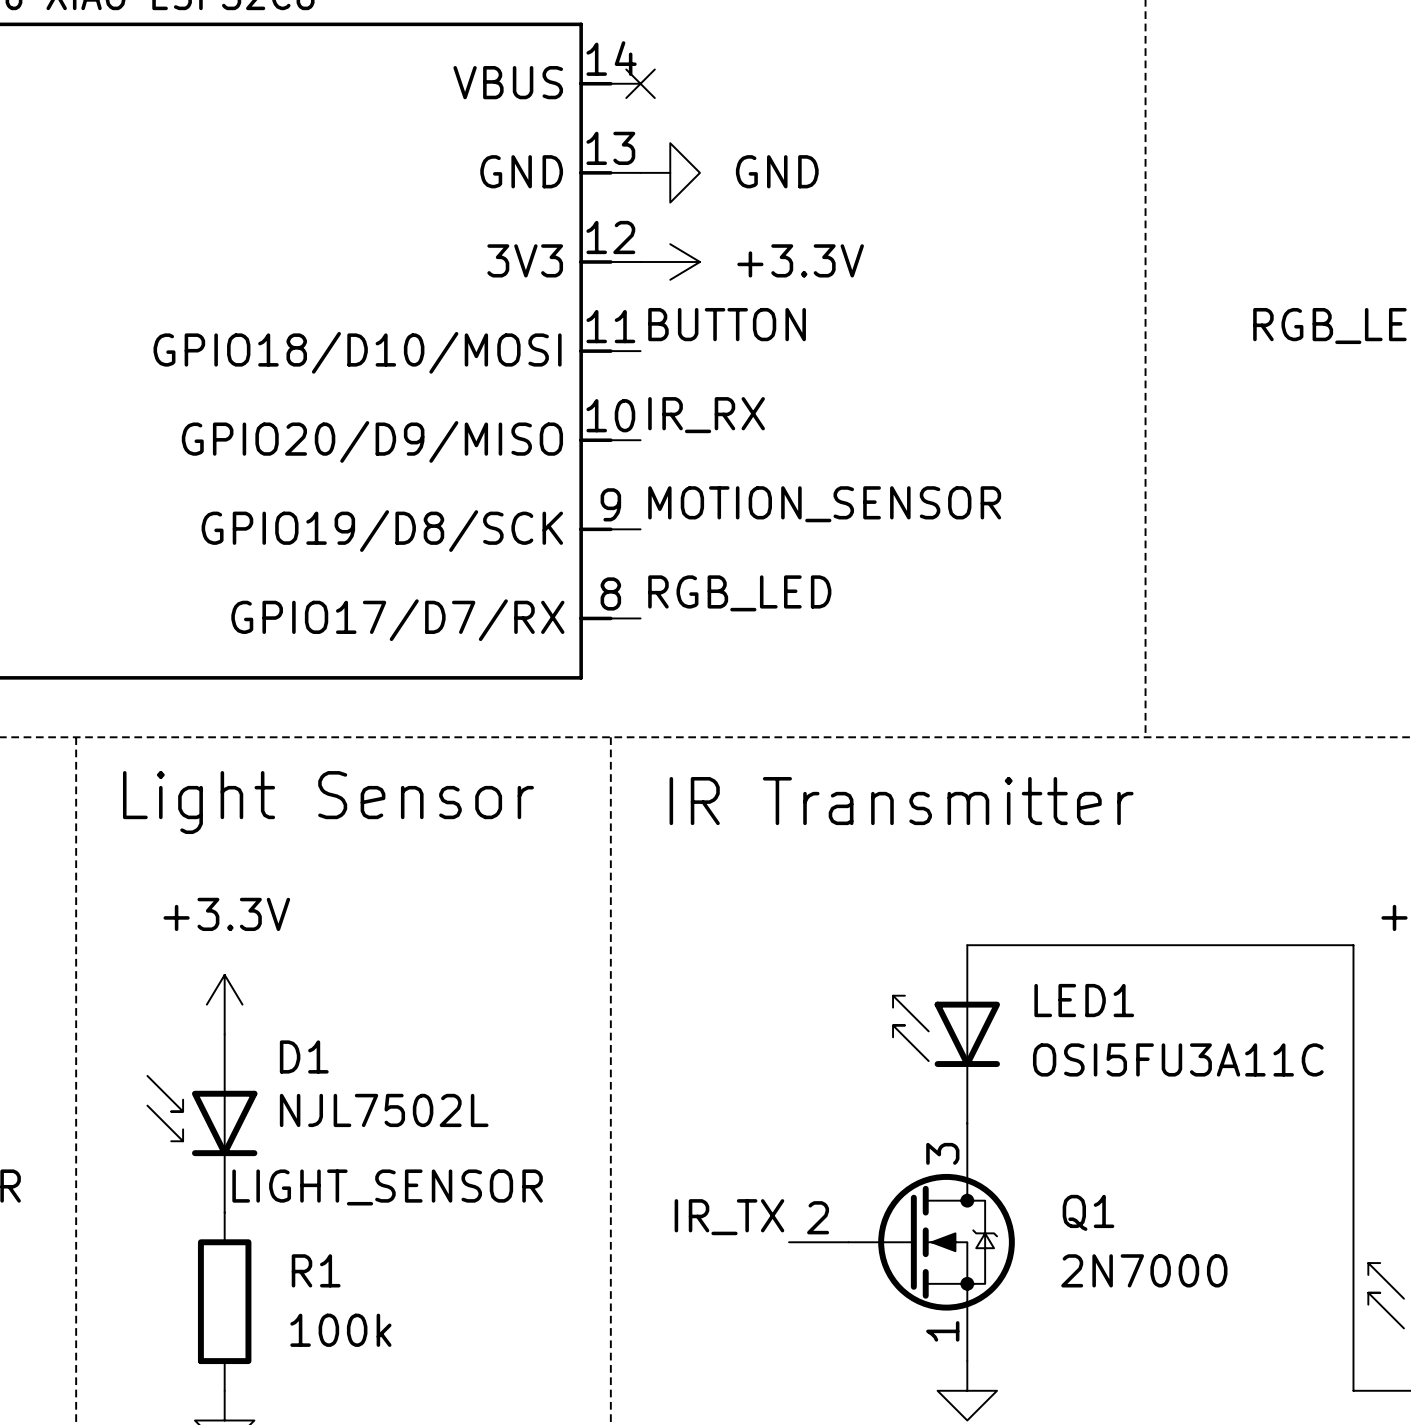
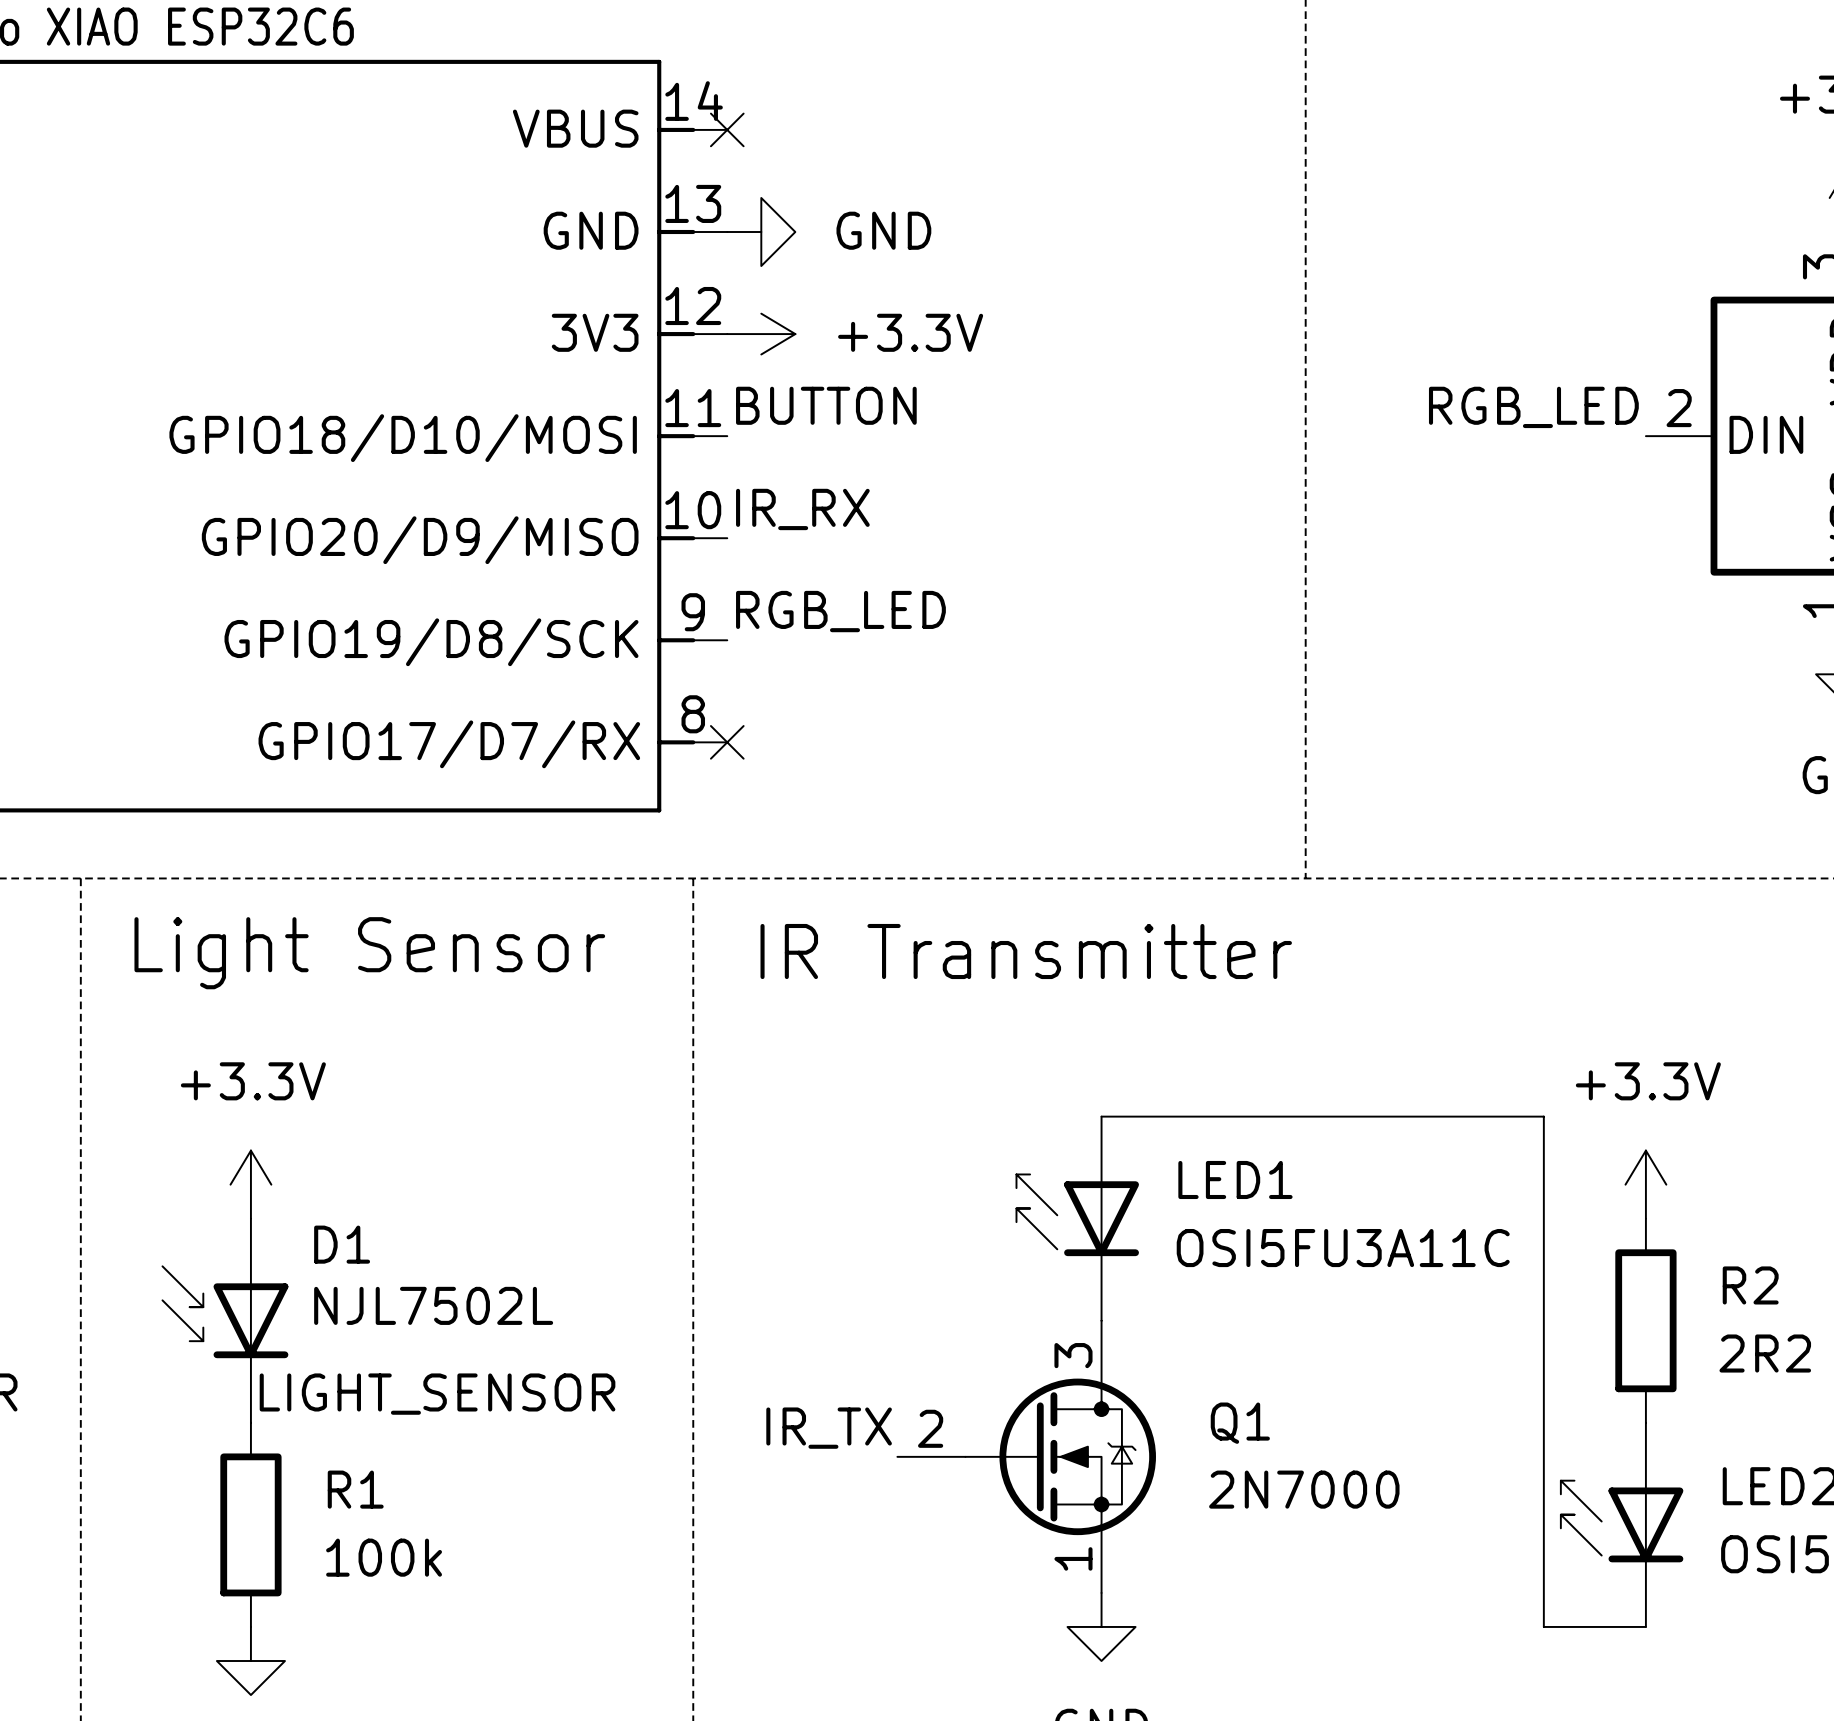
label: MOTION_SENSOR (824, 504) -> RGB_LED (840, 611)
label: RGB_LED (739, 593) -> none
no-connect mark: none -> (727, 742)

